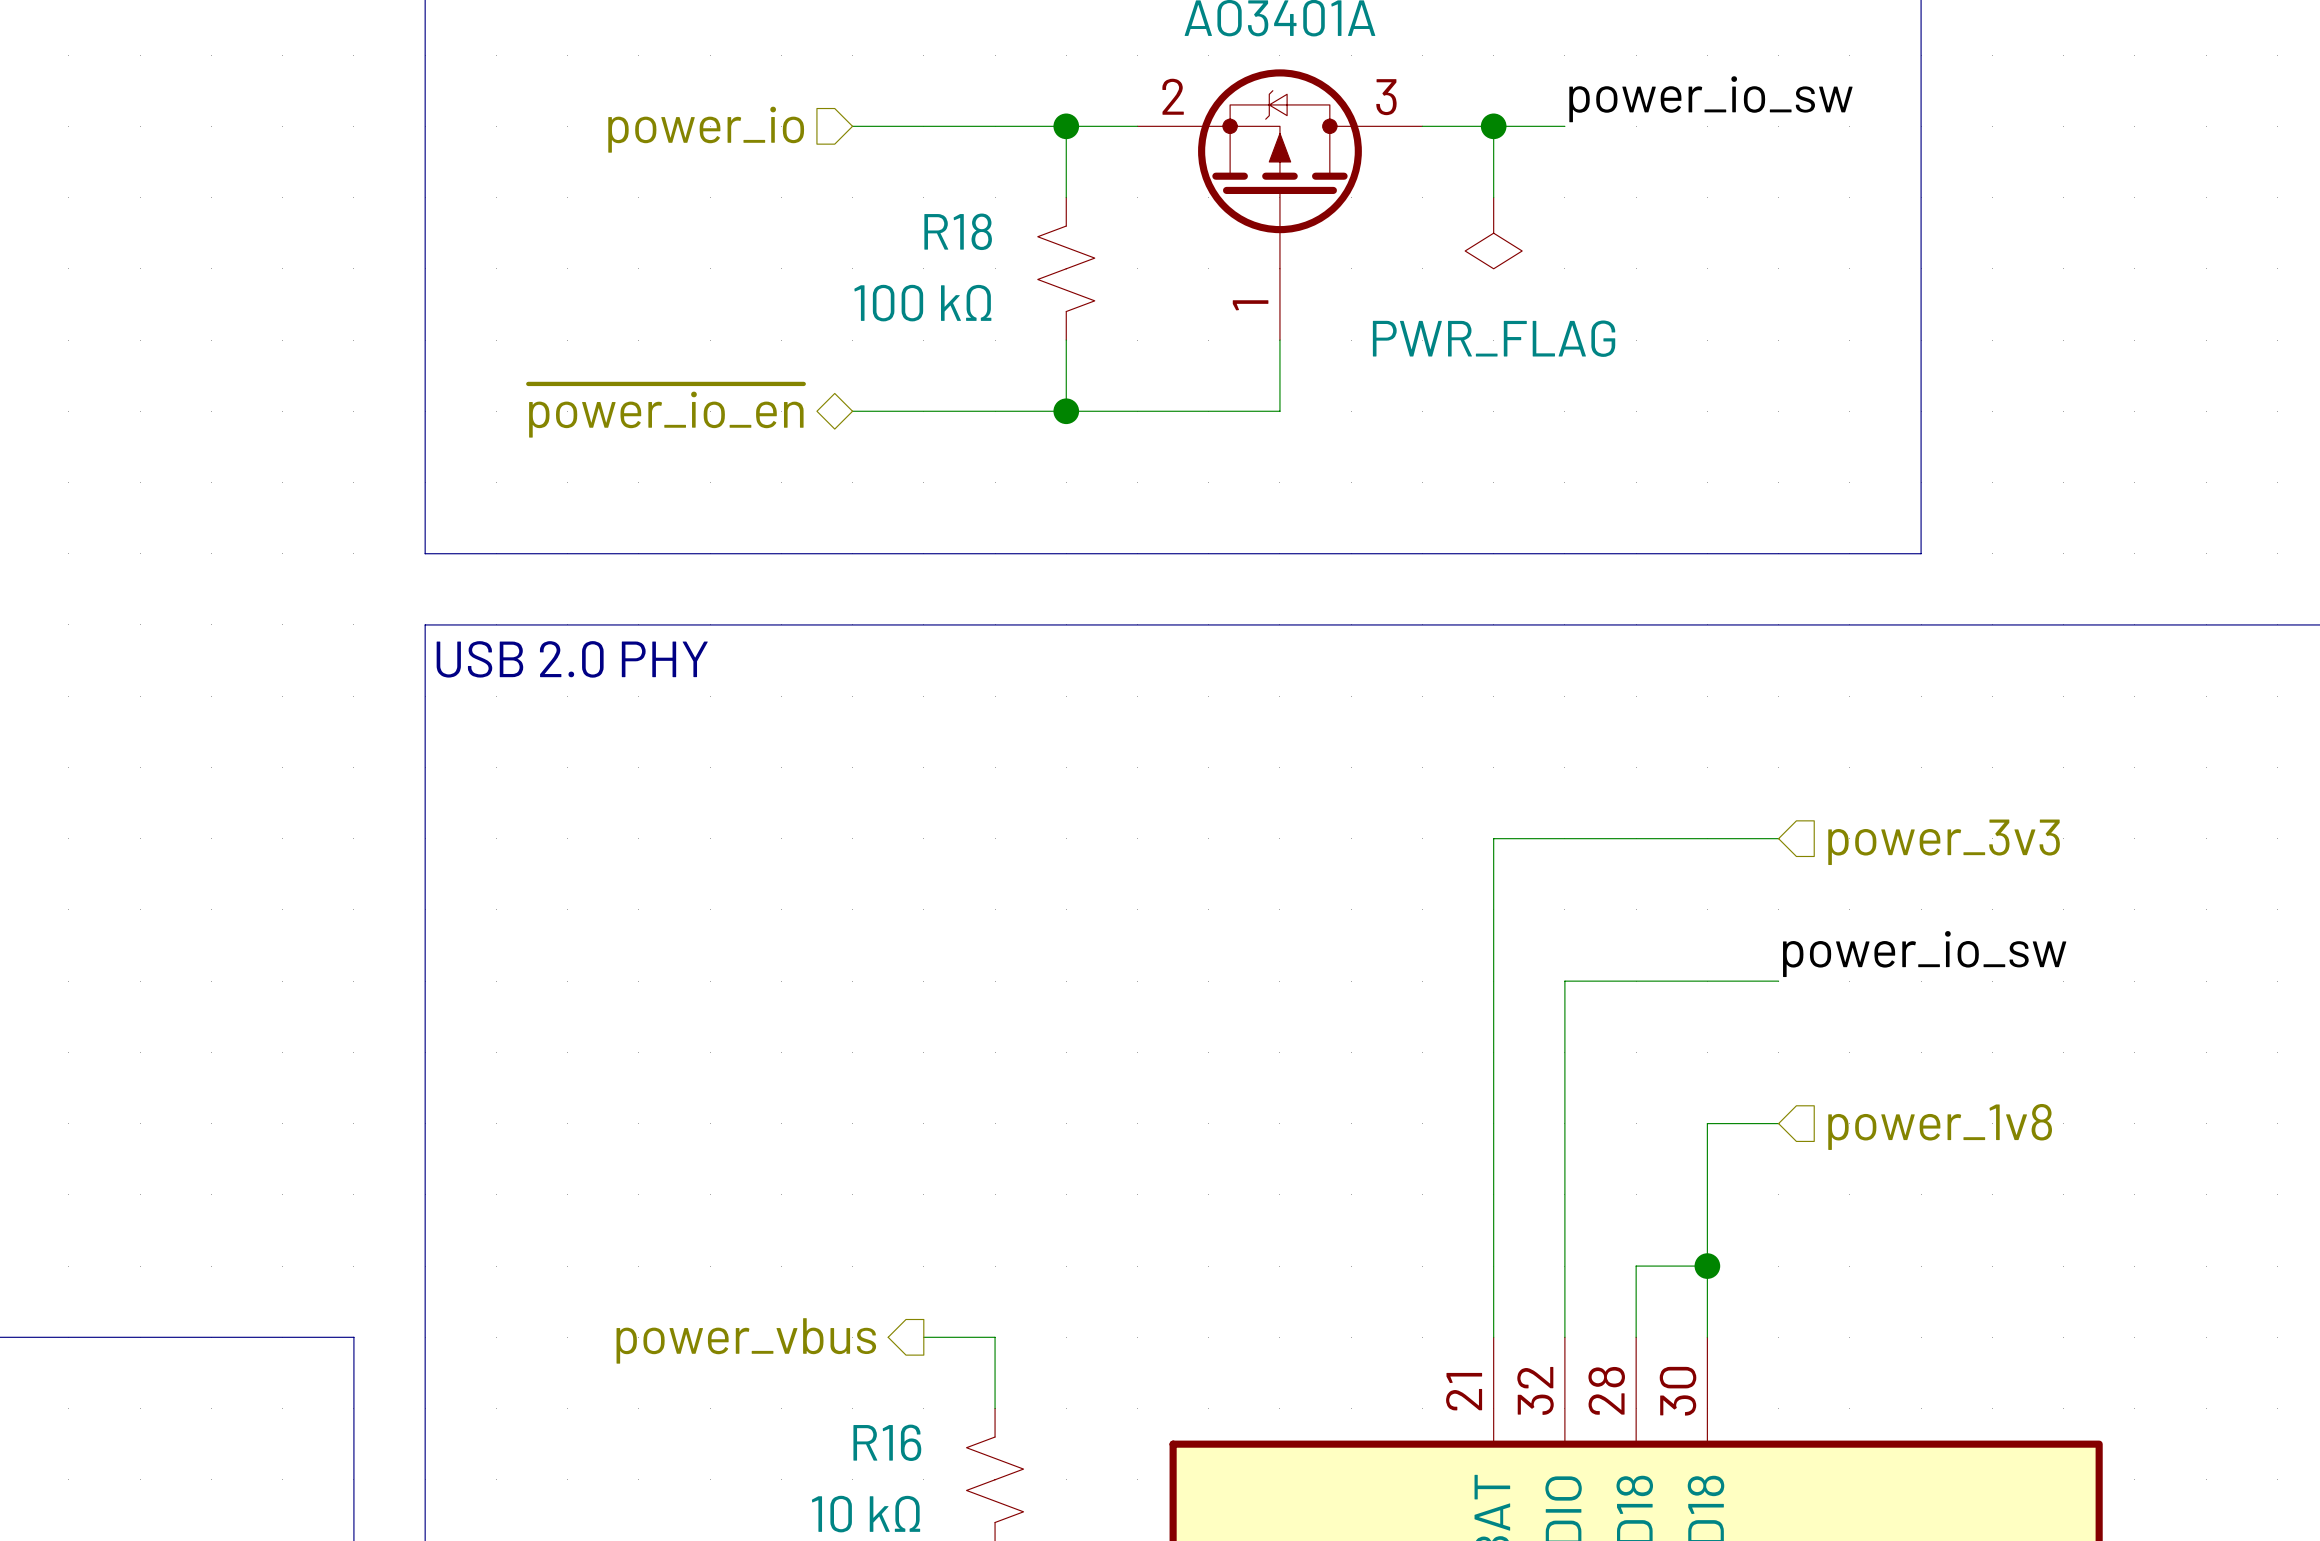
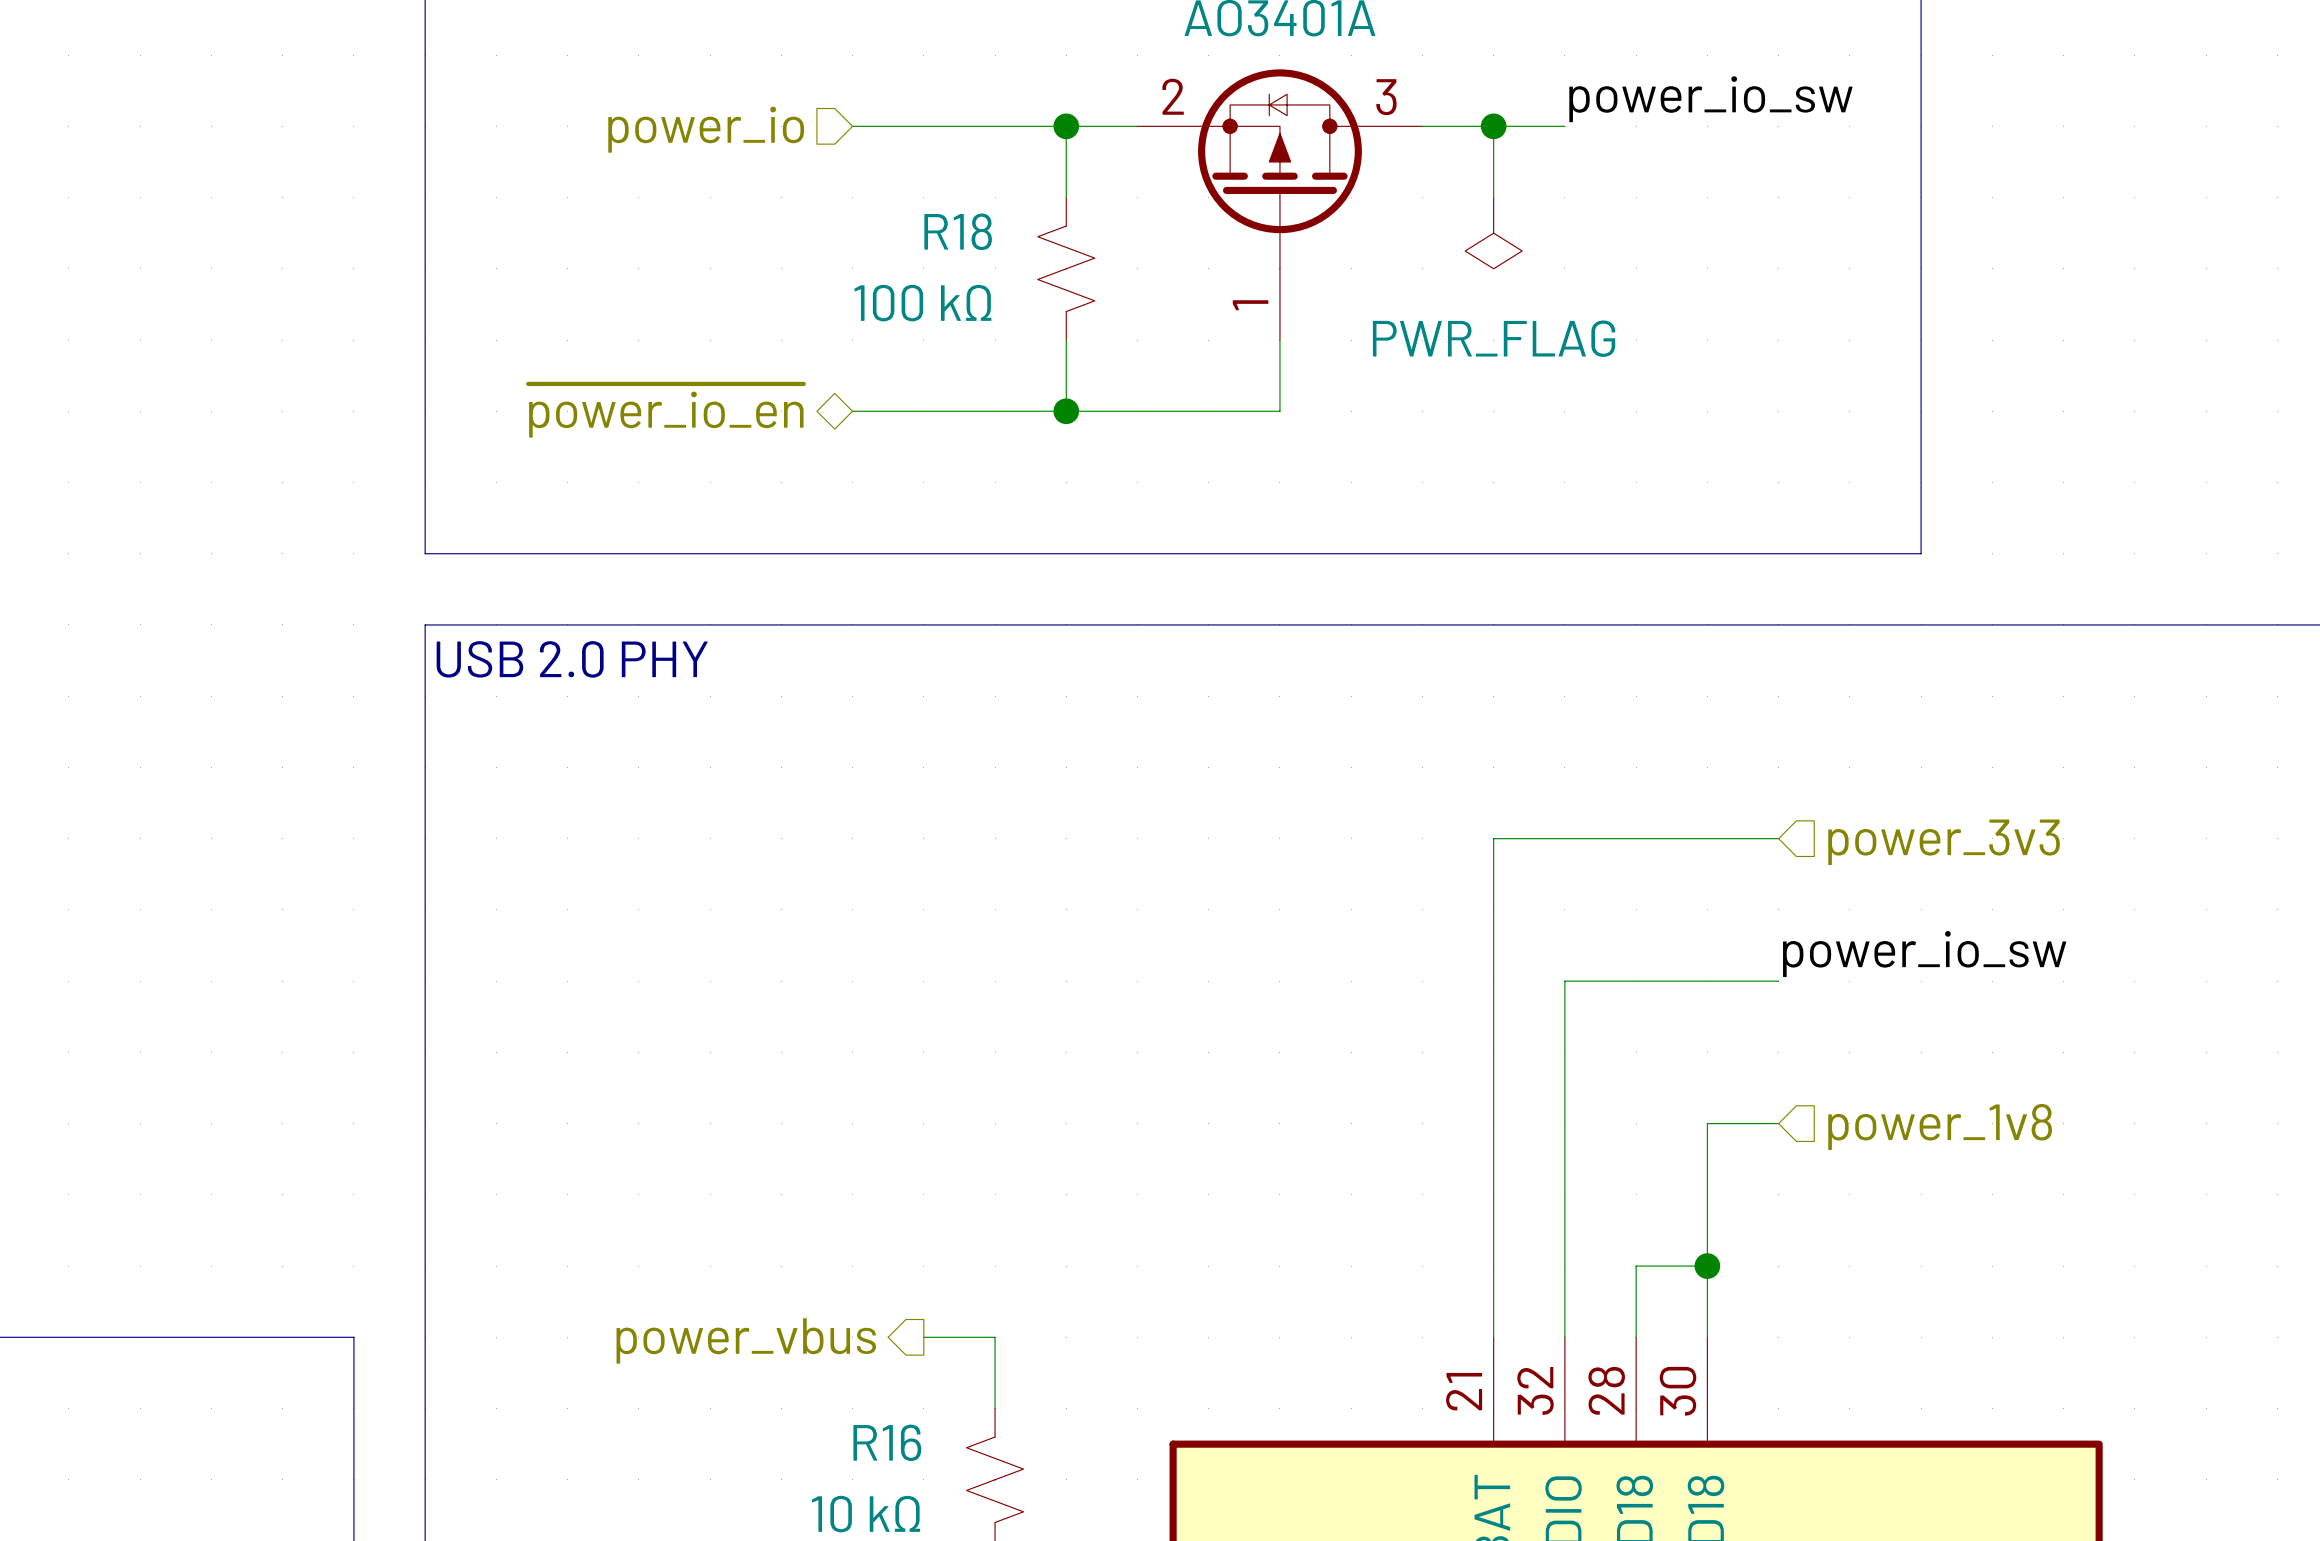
part symbol: [1137, 69, 1423, 341] -> [1137, 69, 1423, 341]

